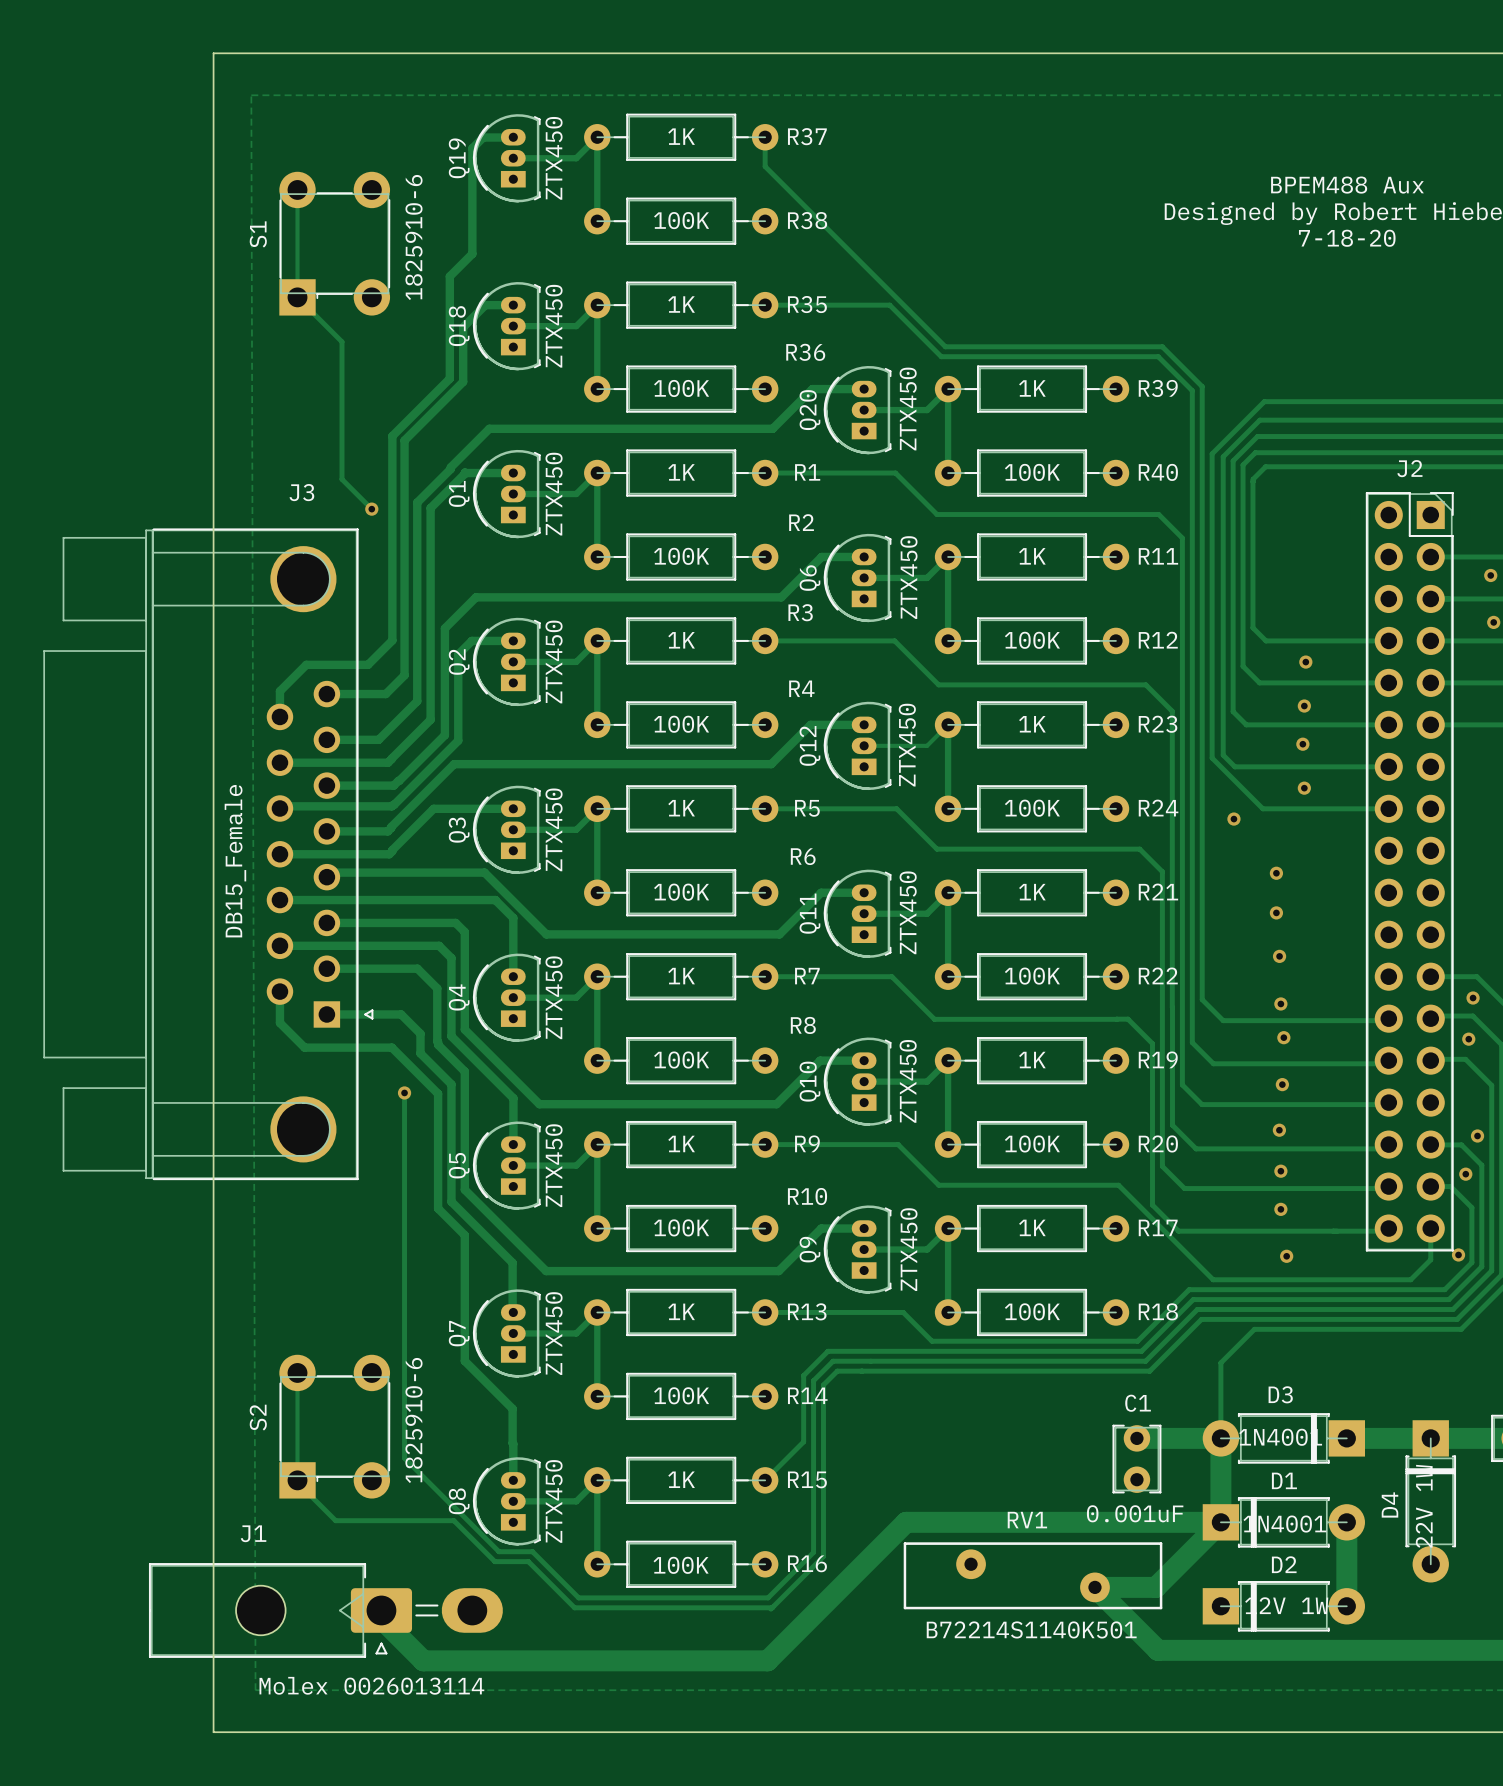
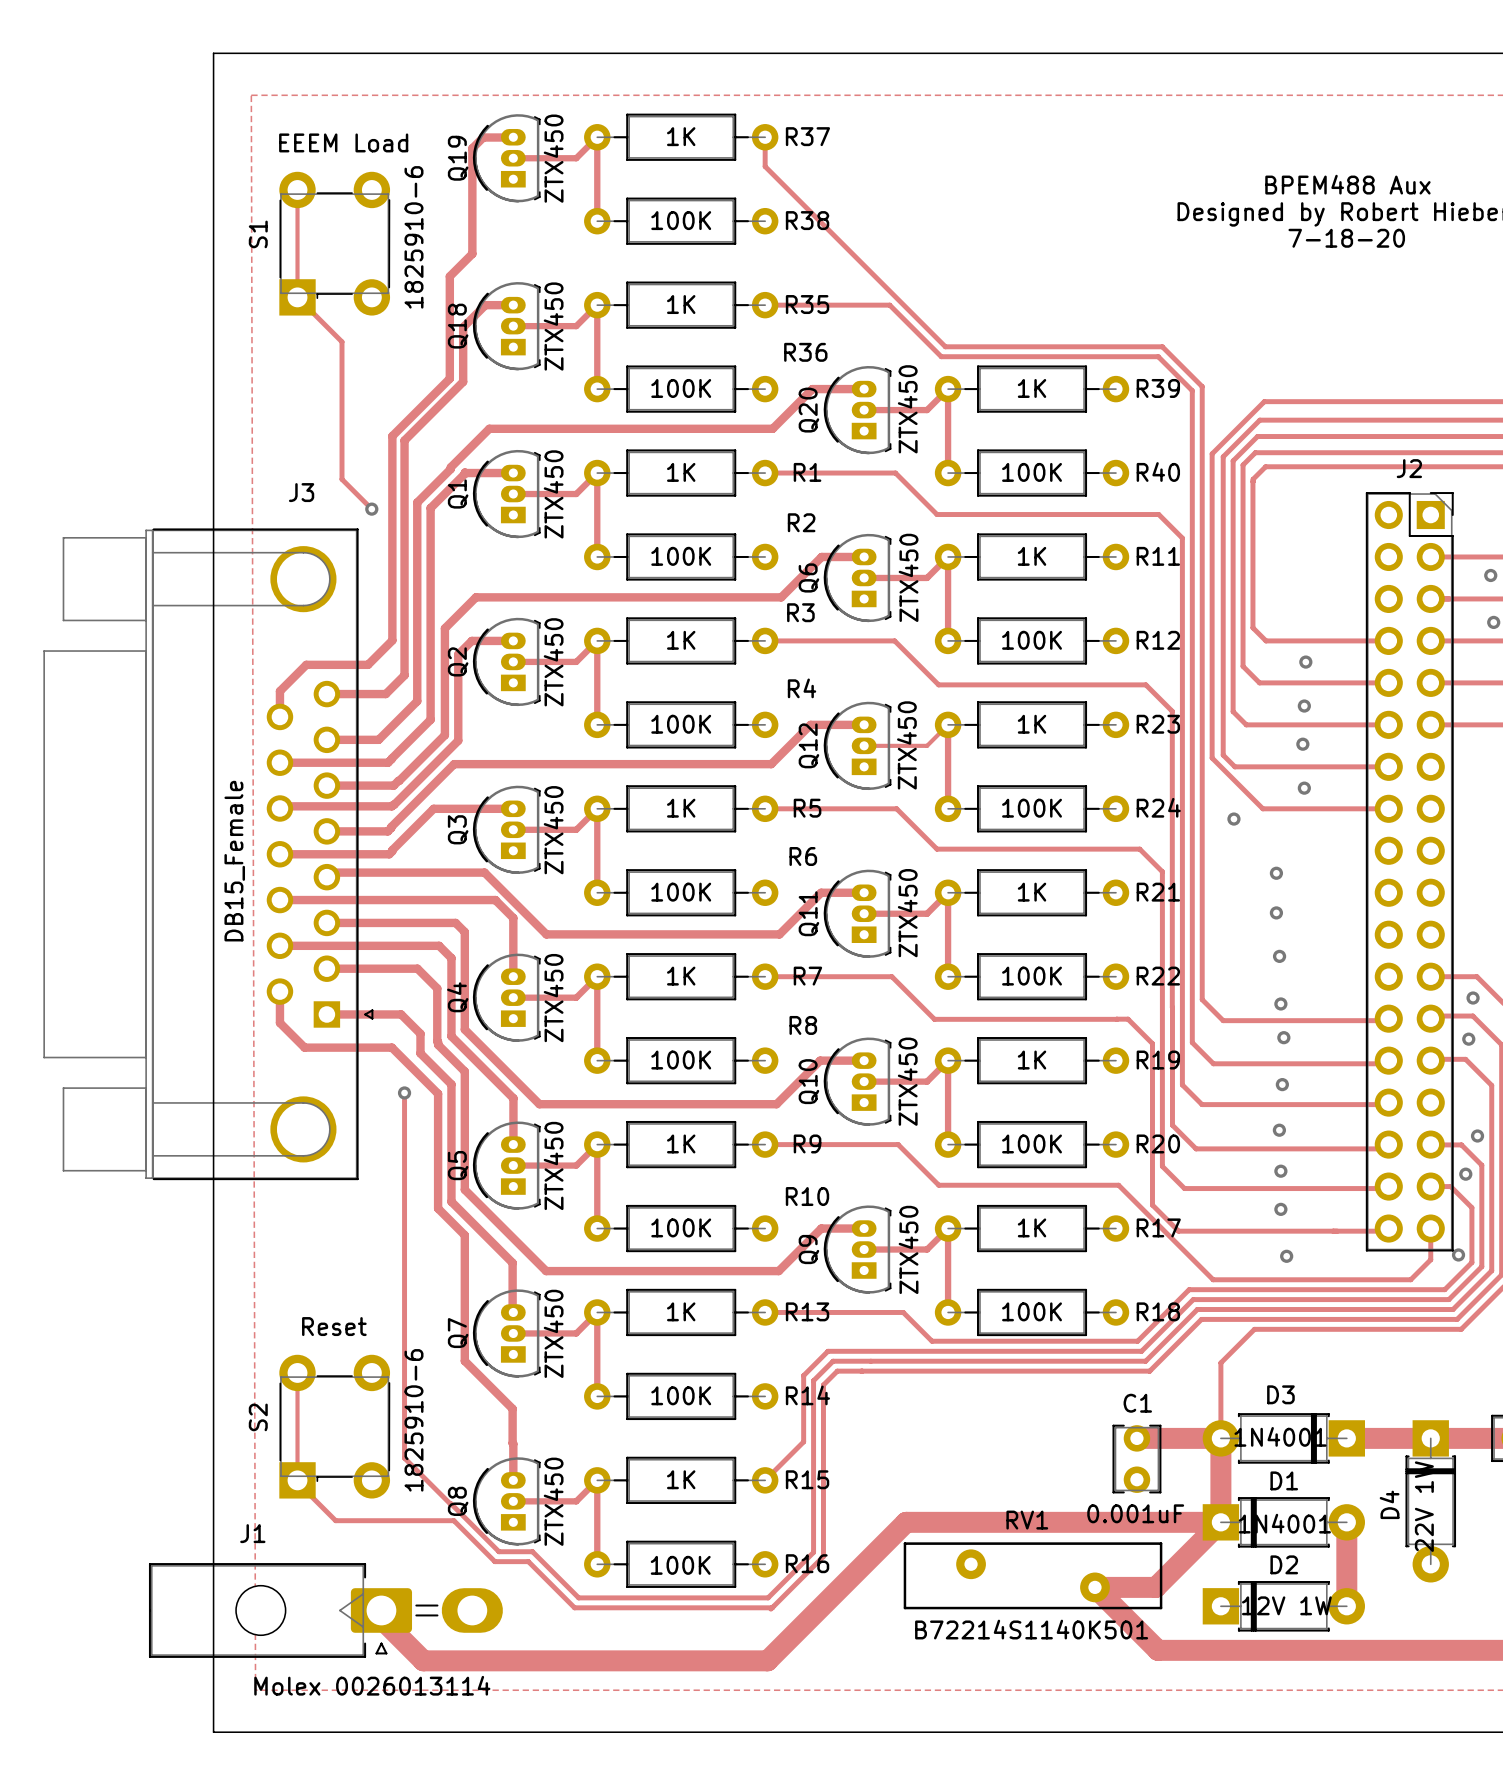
text: none -> EEEM Load (343, 142)
text: none -> Reset (334, 1326)

